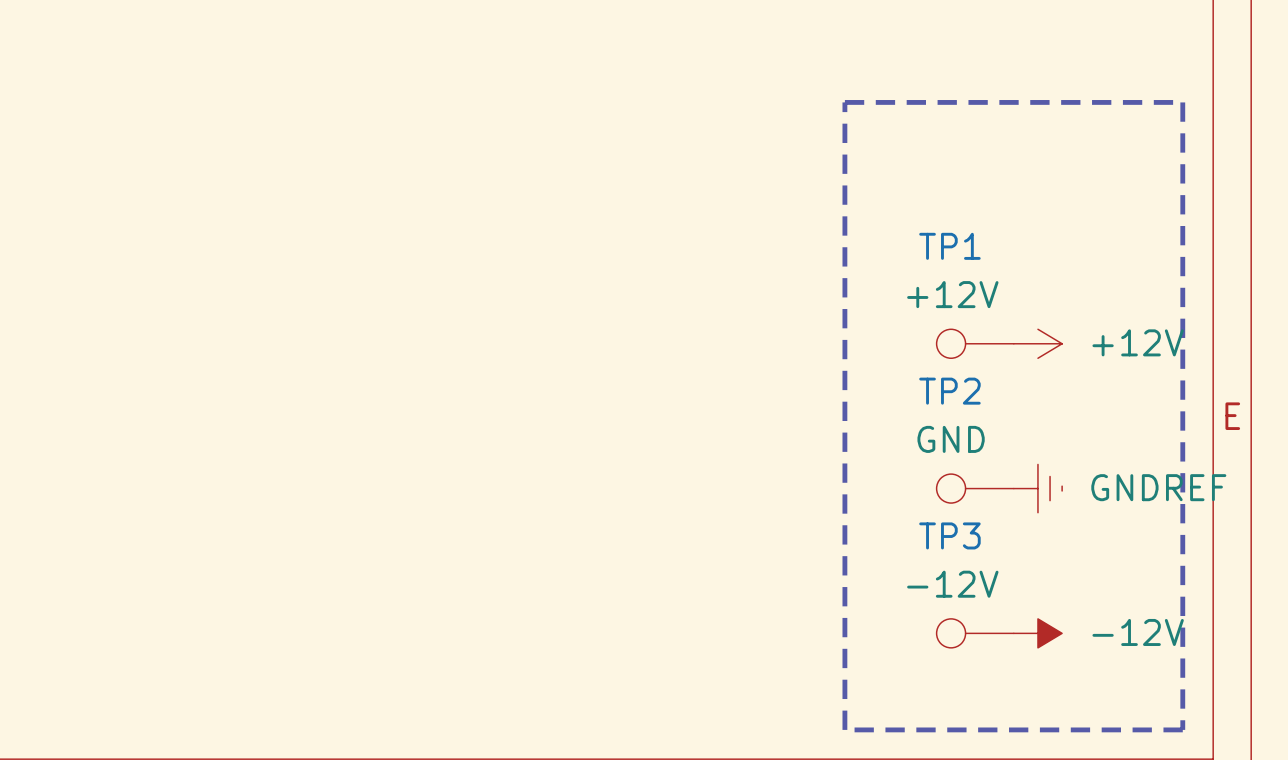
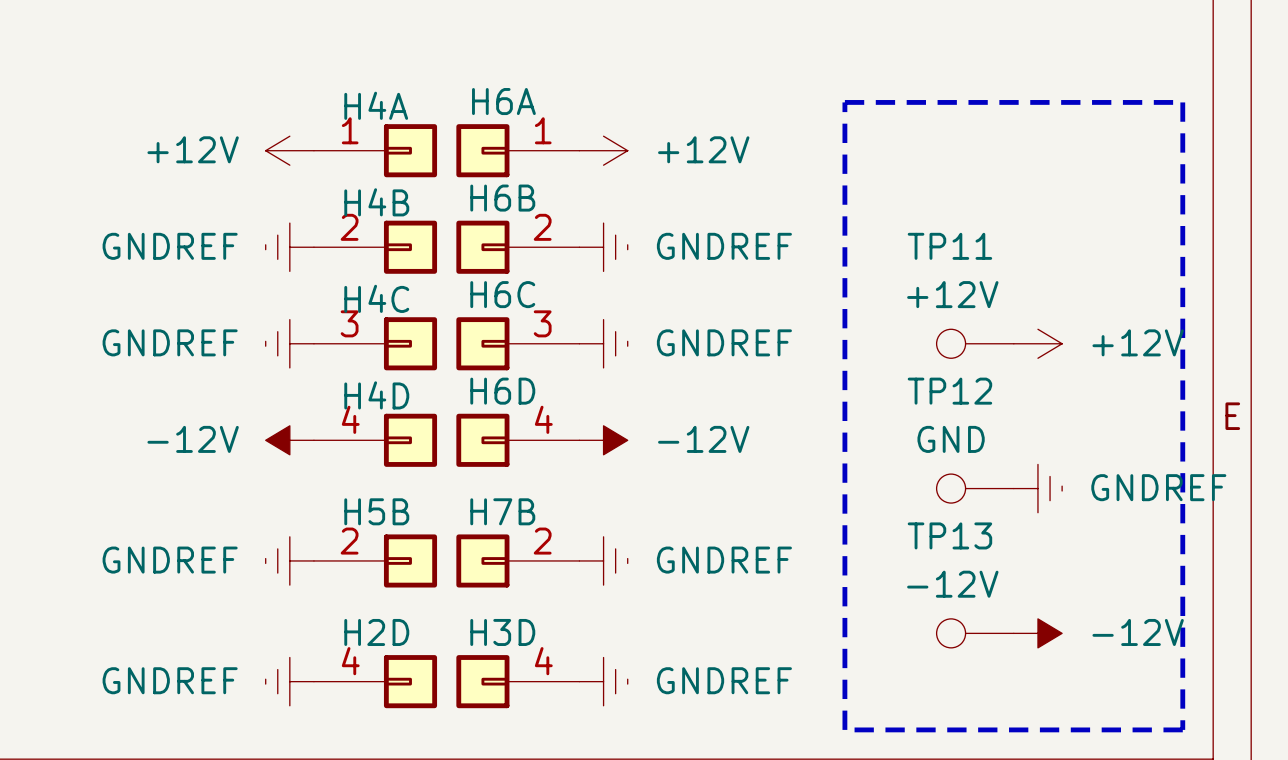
power symbol: none -> +12V (289, 150)
H4A: none -> (375, 150)
H6A: none -> (517, 150)
power symbol: none -> +12V (603, 150)
TP1 name: TP1 (949, 246) -> TP11 (949, 246)
power symbol: none -> GNDREF (289, 247)
H4B: none -> (375, 247)
H6B: none -> (517, 247)
power symbol: none -> GNDREF (603, 247)
power symbol: none -> GNDREF (289, 343)
H4C: none -> (375, 343)
H6C: none -> (517, 343)
power symbol: none -> GNDREF (603, 343)
TP2 name: TP2 (949, 391) -> TP12 (949, 391)
power symbol: none -> -12V (289, 440)
H4D: none -> (375, 440)
H6D: none -> (517, 440)
power symbol: none -> -12V (603, 440)
TP3 name: TP3 (949, 535) -> TP13 (949, 535)
power symbol: none -> GNDREF (289, 560)
H5B: none -> (375, 560)
H7B: none -> (517, 560)
power symbol: none -> GNDREF (603, 560)
power symbol: none -> GNDREF (289, 681)
H2D: none -> (375, 681)
H3D: none -> (517, 681)
power symbol: none -> GNDREF (603, 681)

